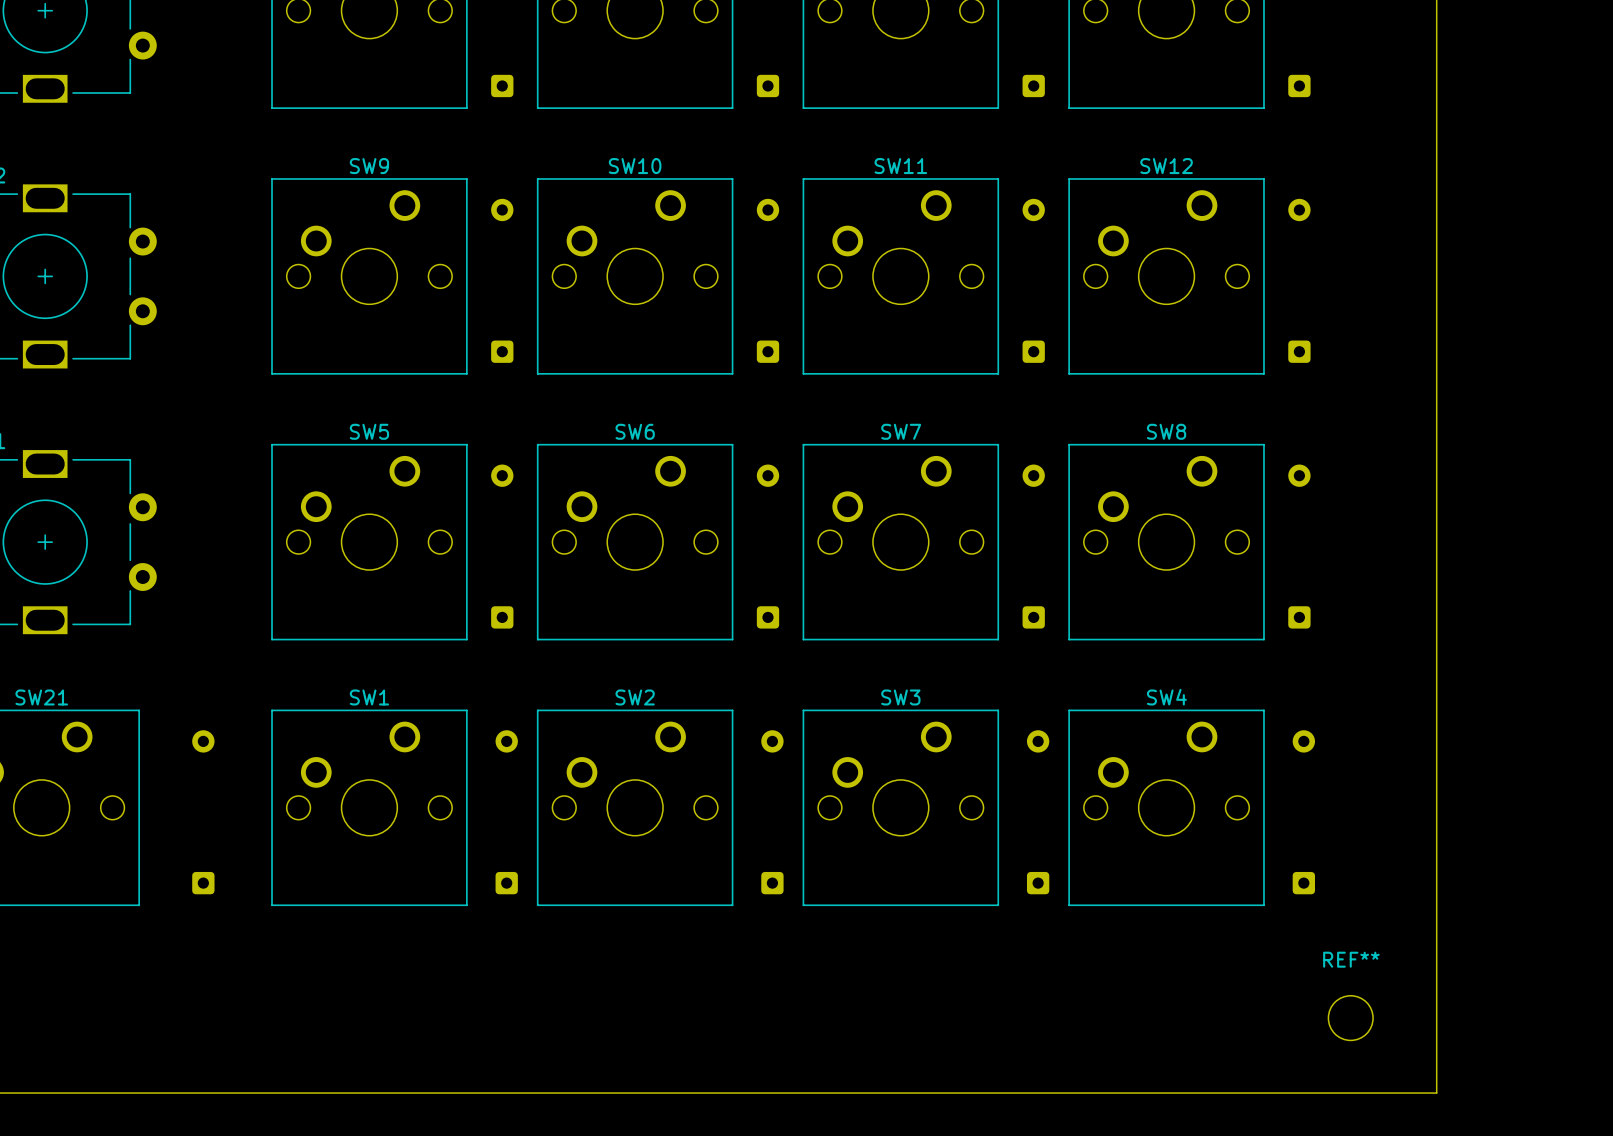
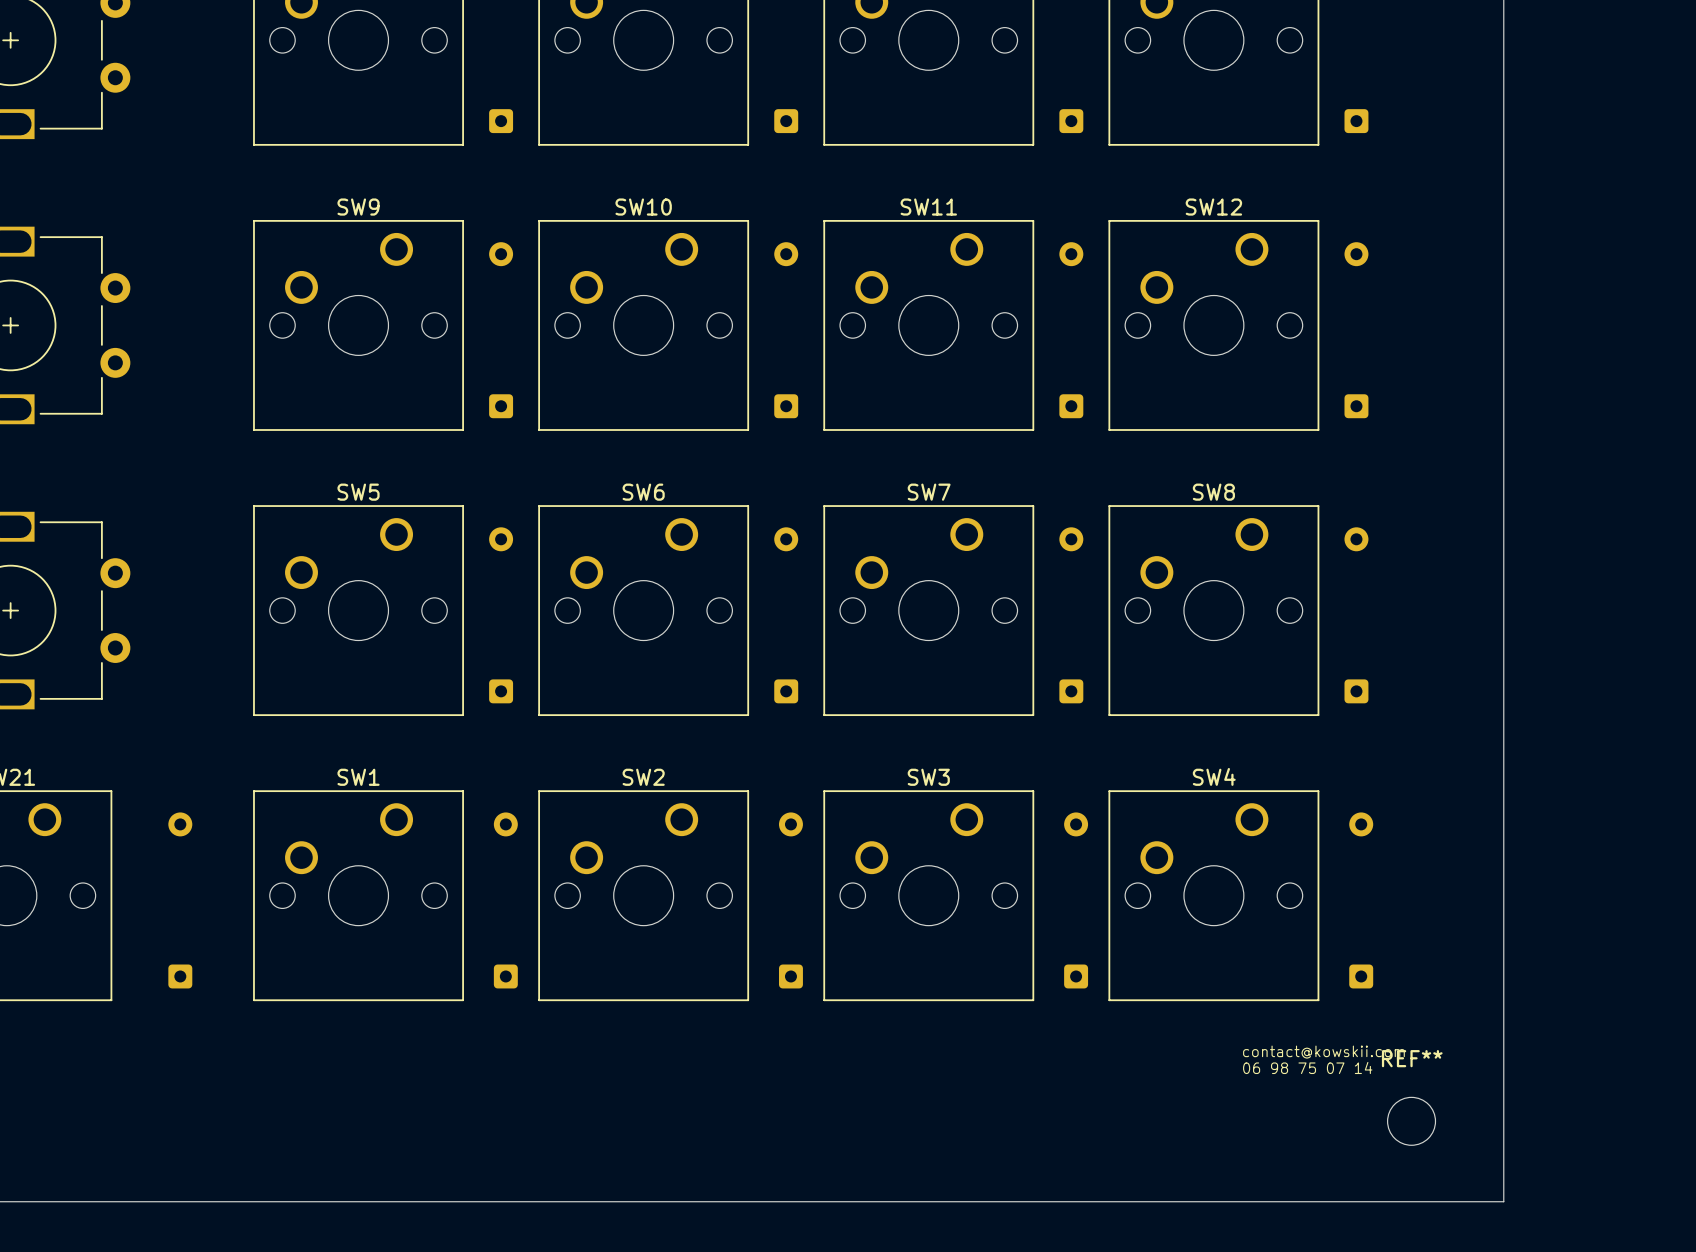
text: none -> contact@kowskii.com (1323, 1052)
text: none -> 06 98 75 07 14 (1307, 1067)

